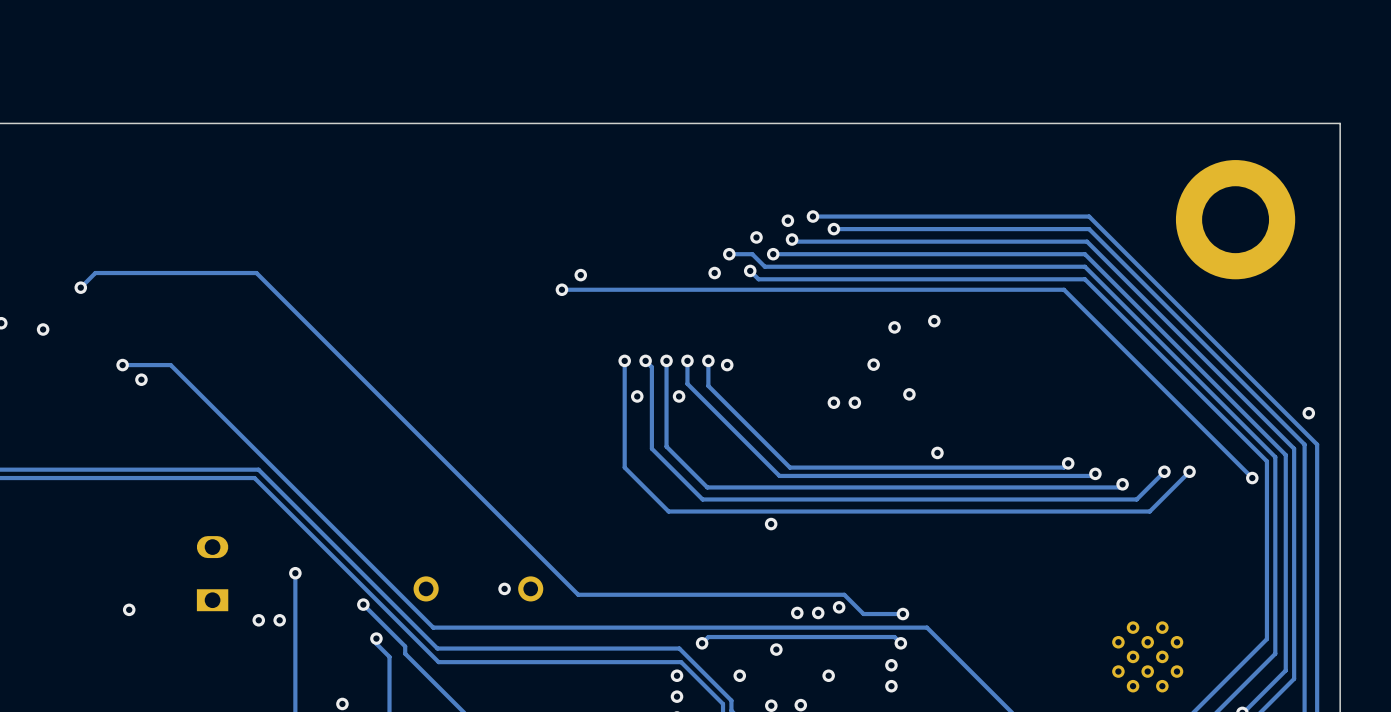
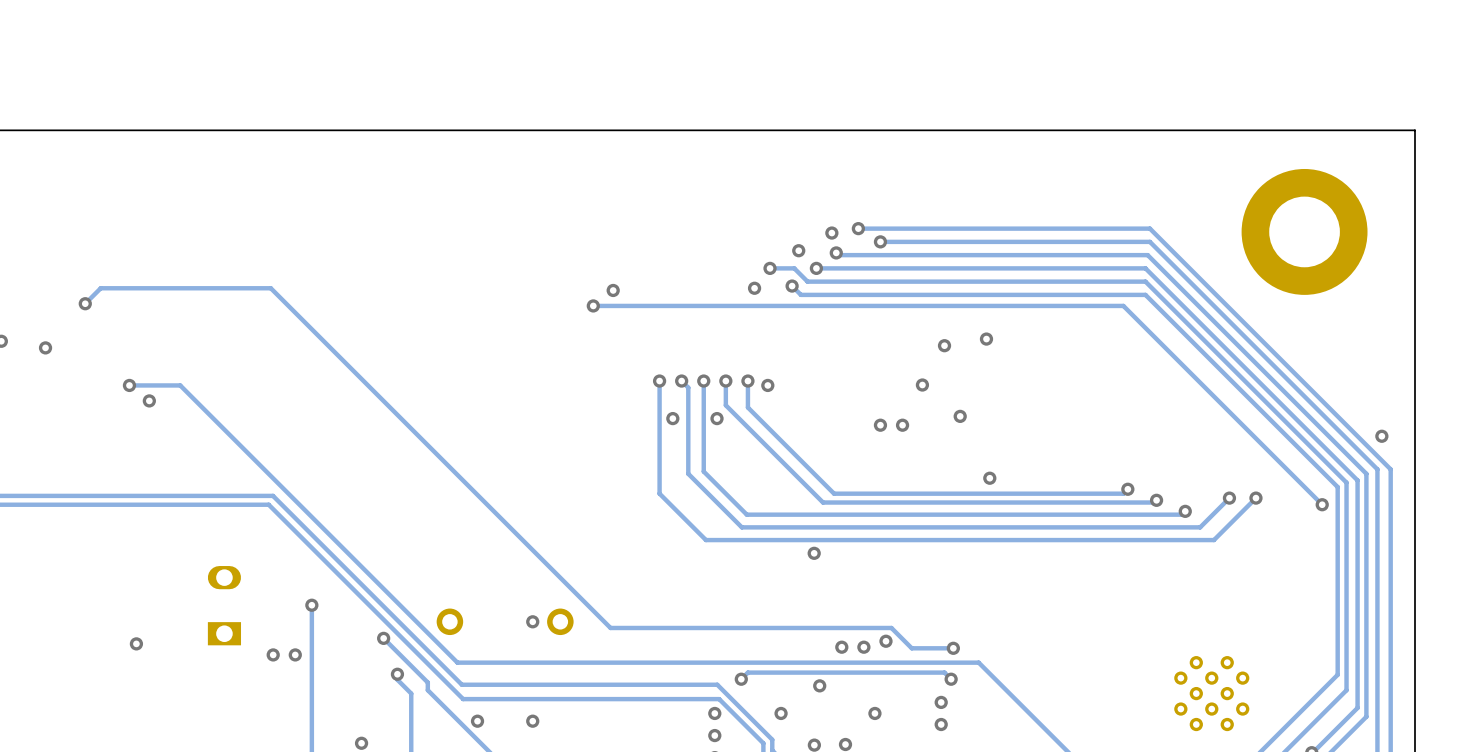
via: none -> (477, 721)
via: none -> (532, 721)

